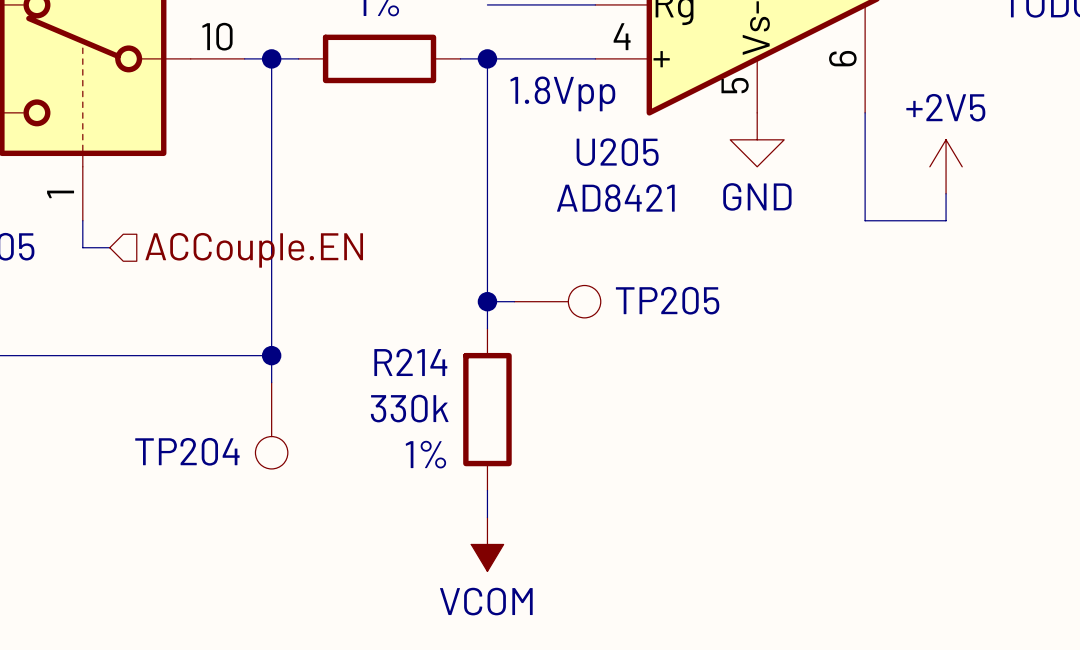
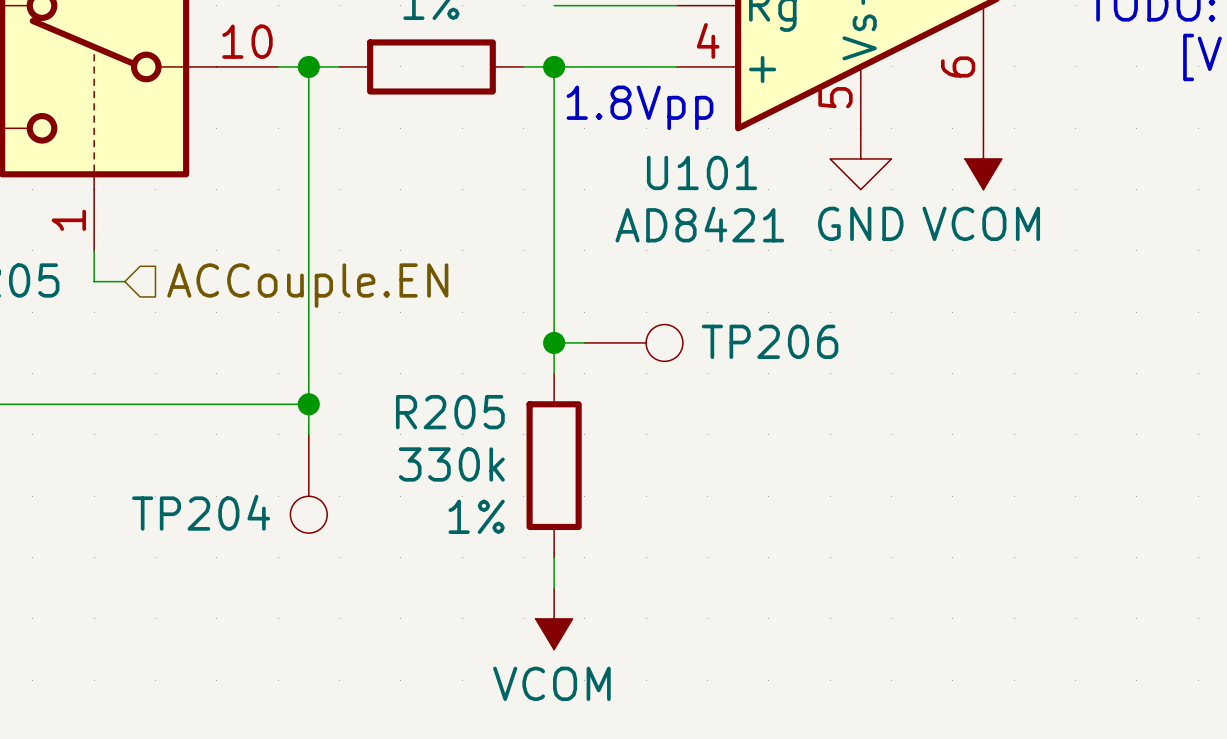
wire: (865, 112) (865, 220) (946, 220) (946, 193) -> none
power symbol: none -> VCOM (983, 158)
U205 name: U205 (617, 152) -> U101 (702, 172)
power symbol: +2V5 (946, 166) -> none
TP205 name: TP205 (667, 300) -> TP206 (770, 341)
R214 name: R214 (410, 362) -> R205 (450, 412)

